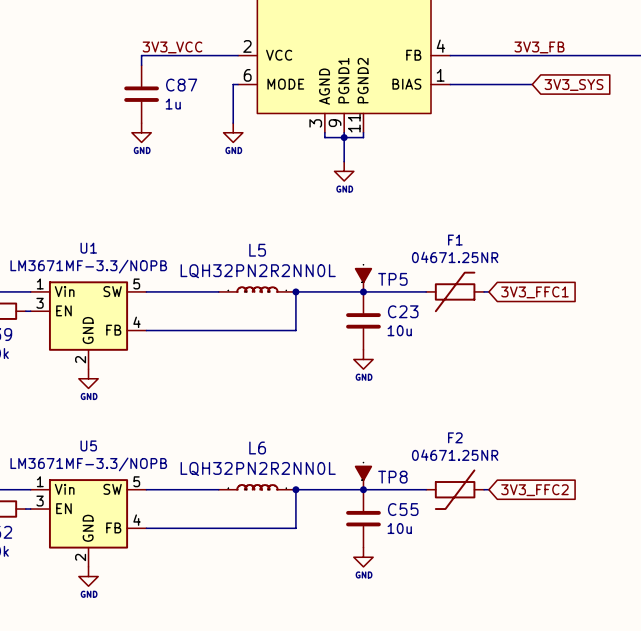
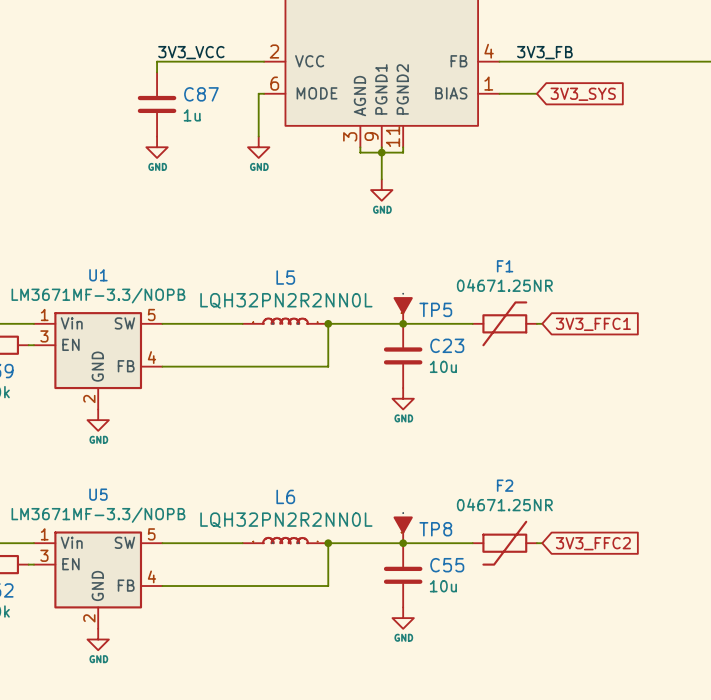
label position: 3V3_FB (539, 47) -> 3V3_FB (544, 52)
wire: (484, 84) (532, 84) -> none
global label position: 3V3_SYS (574, 84) -> 3V3_SYS (583, 94)

